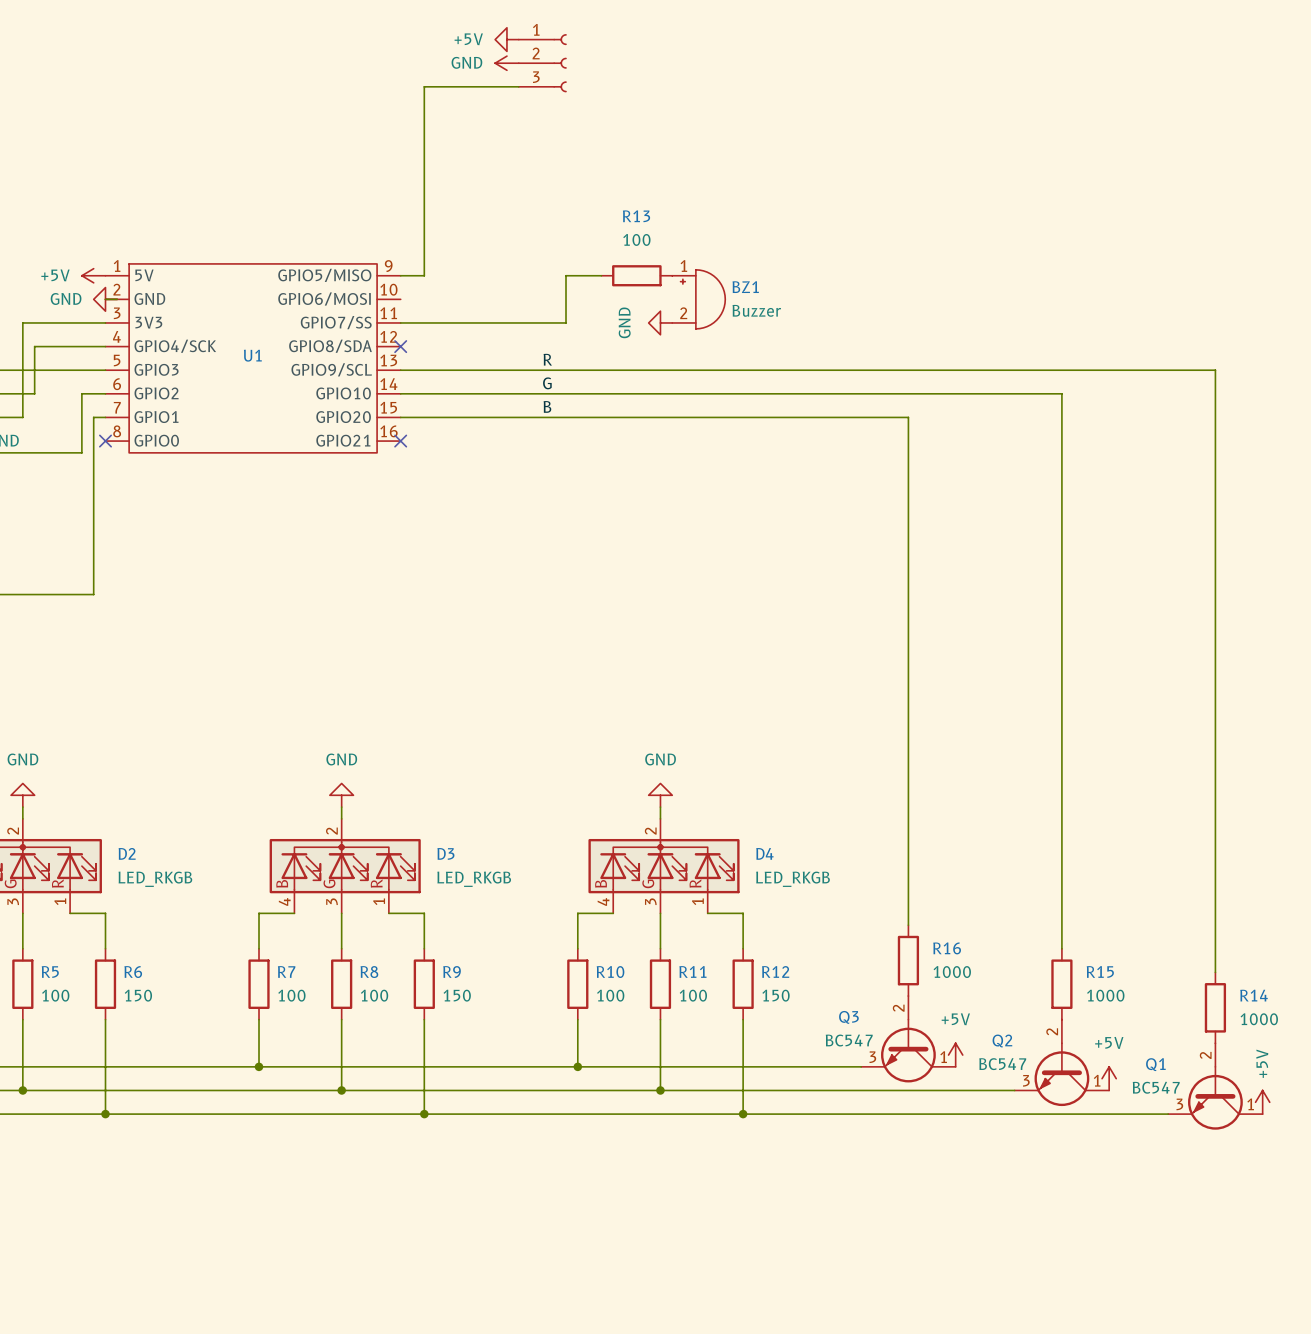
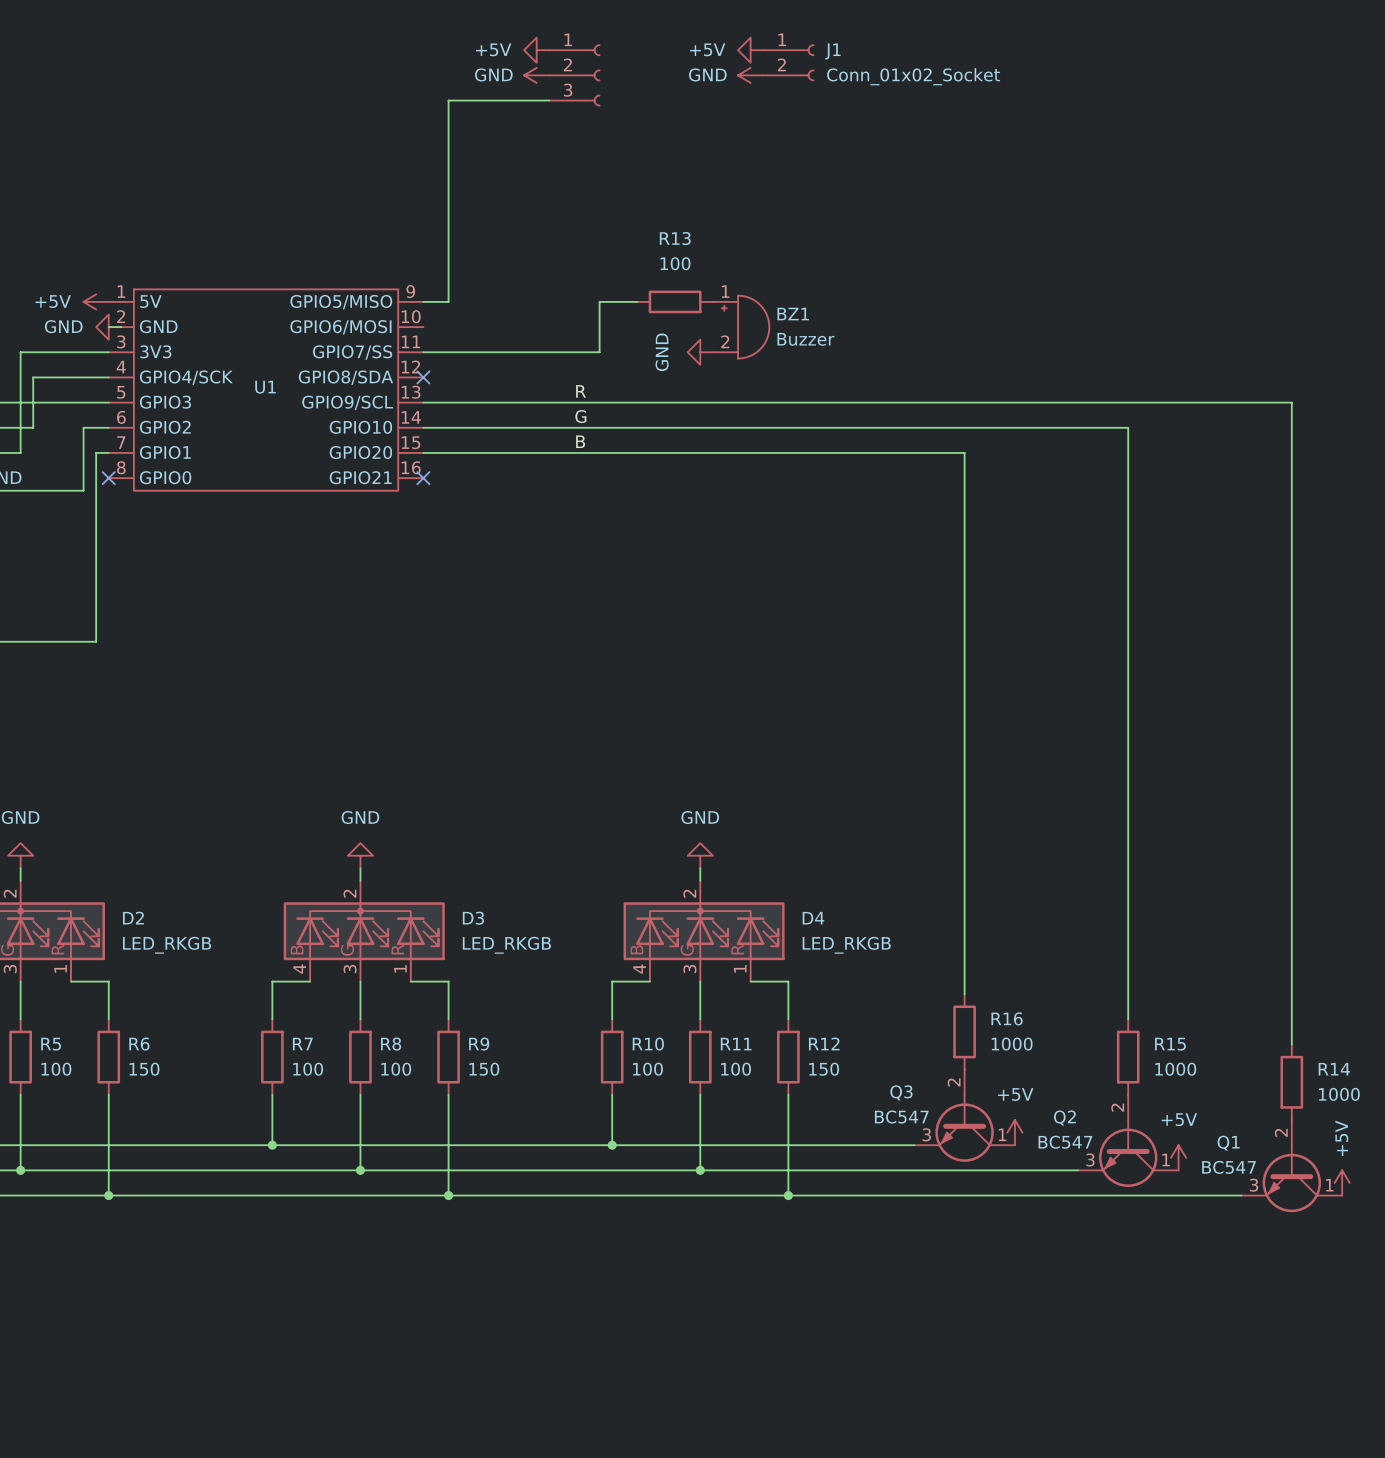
power symbol: none -> +5V (750, 50)
J1: none -> Conn_01x02_Socket (788, 62)
power symbol: none -> GND (750, 75)

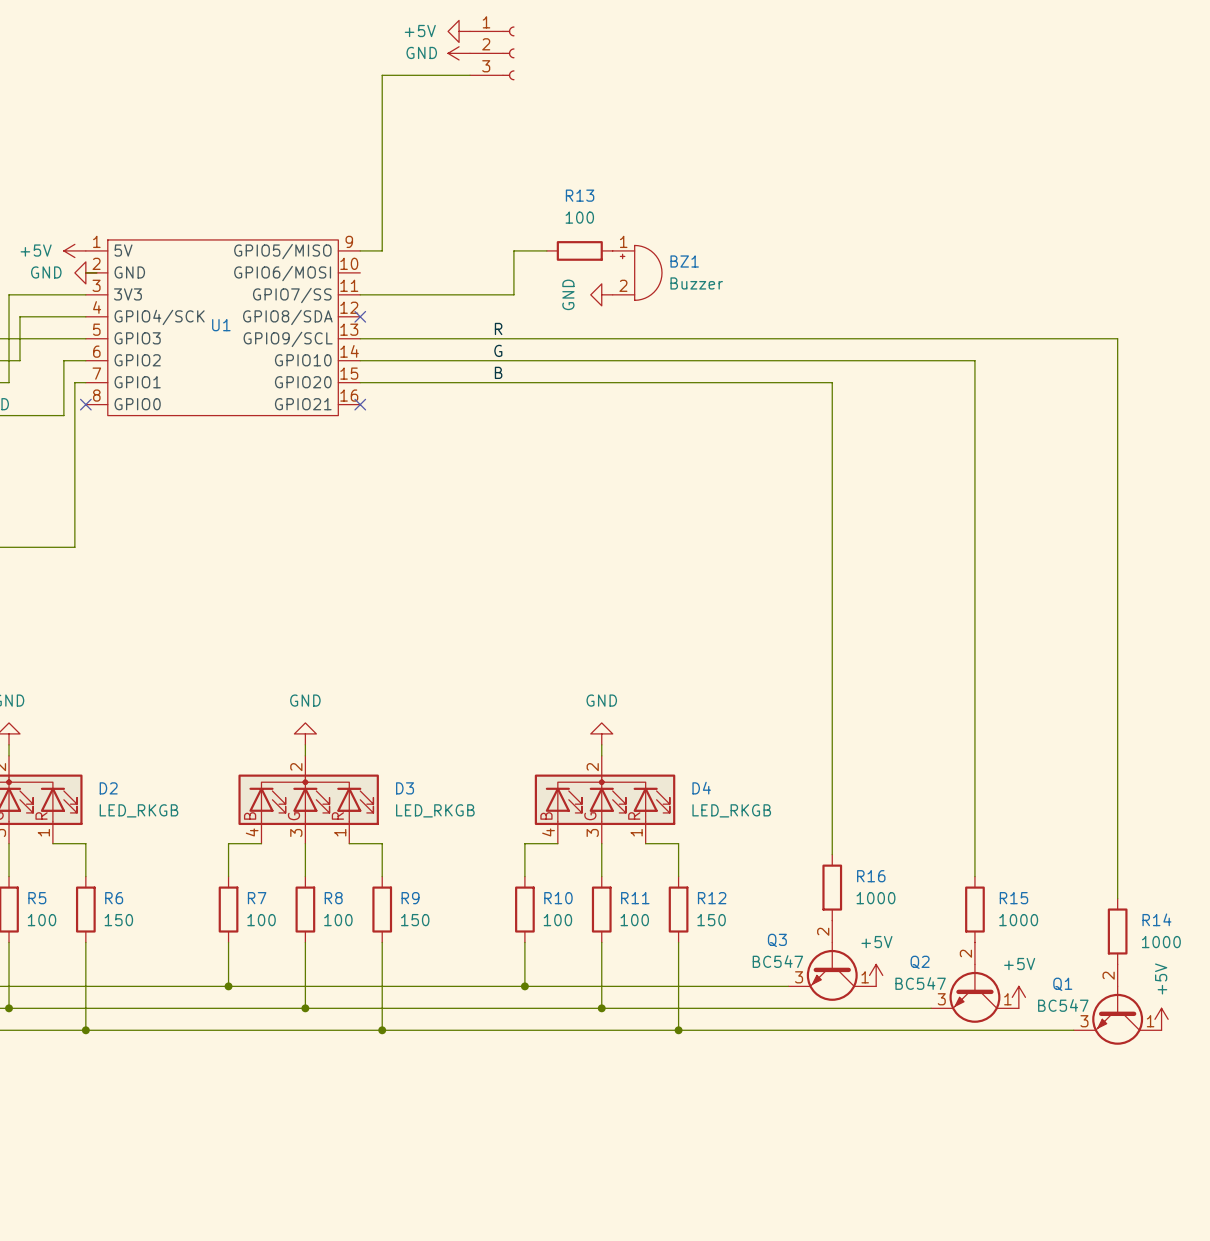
power symbol: +5V (750, 50) -> none
J1: Conn_01x02_Socket (788, 62) -> none
power symbol: GND (750, 75) -> none

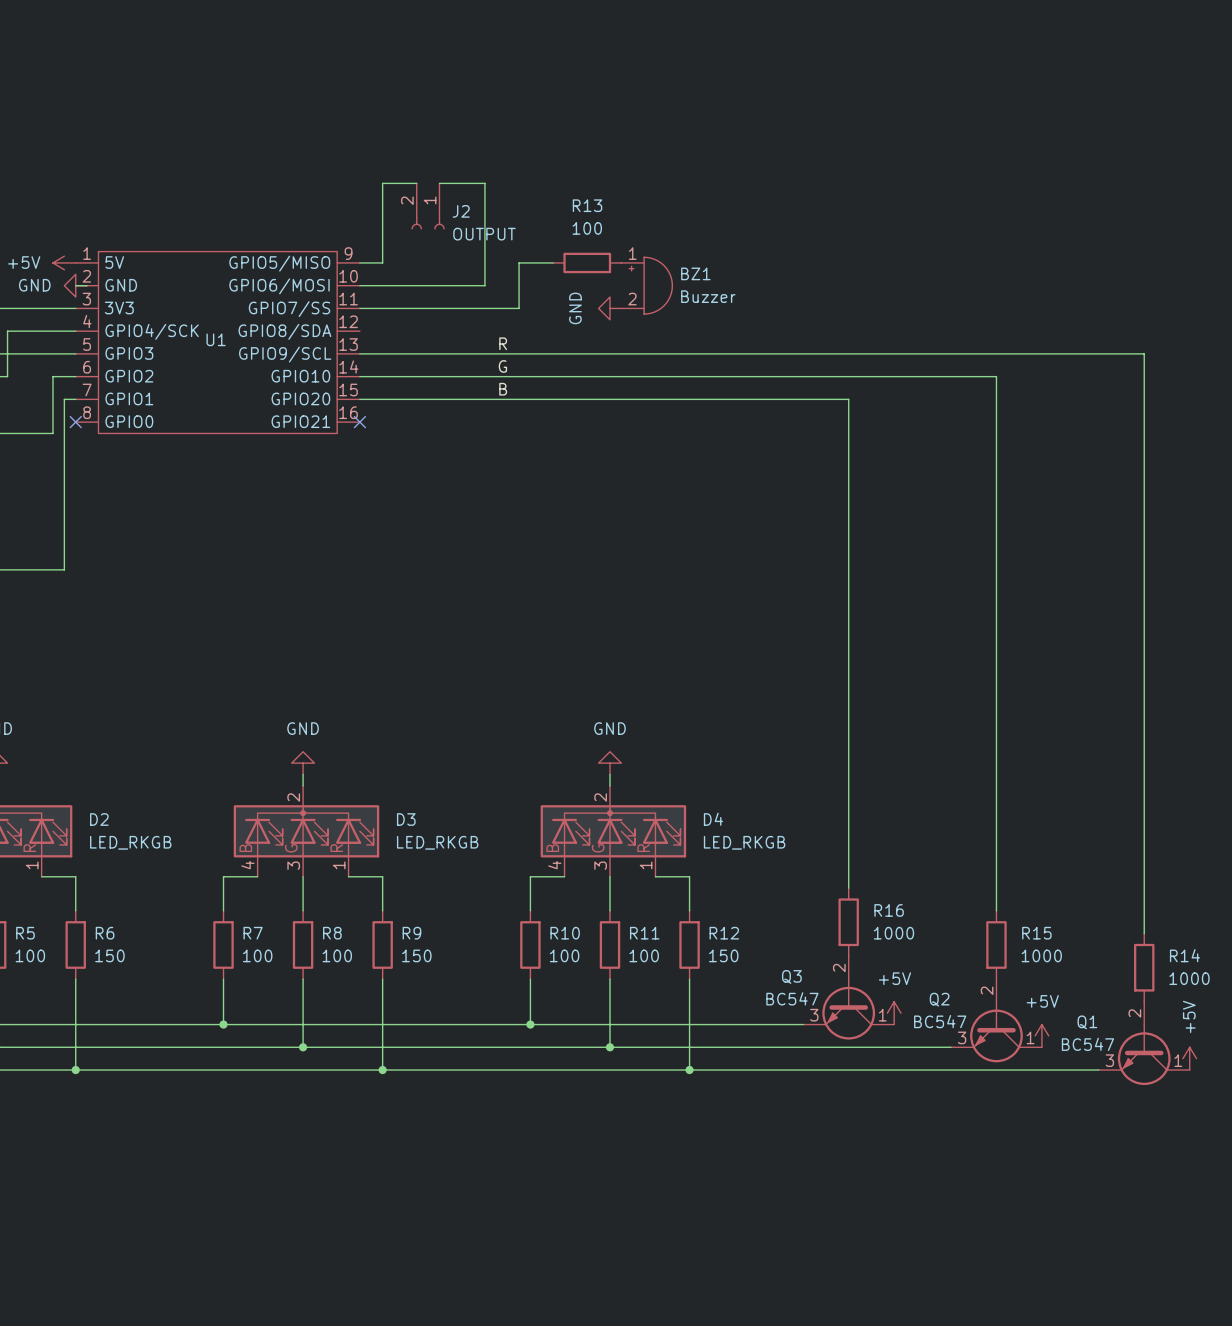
power symbol: +5V (459, 31) -> none
power symbol: GND (459, 53) -> none
part: (492, 53) -> none
wire: (470, 75) (382, 75) (382, 174) -> (416, 183) (382, 183)
wire: none -> (439, 183) (484, 183) (484, 285) (359, 285)
J2: none -> OUTPUT (428, 206)
no-connect mark: (360, 316) -> none

